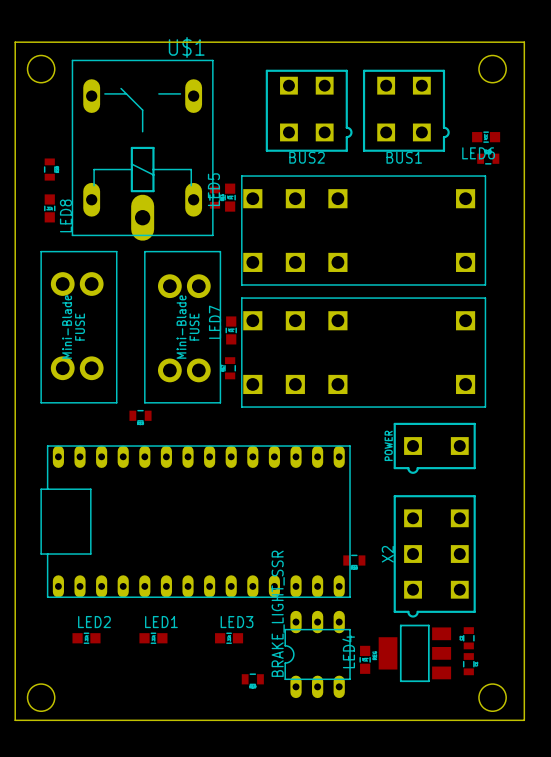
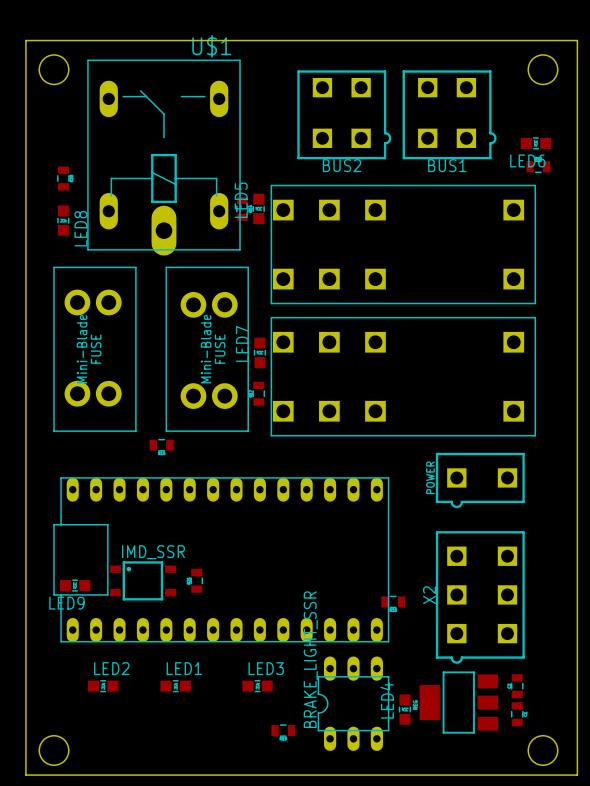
IMD_SSR: none -> (142, 580)
part: none -> (196, 580)
LED9: none -> (75, 585)

